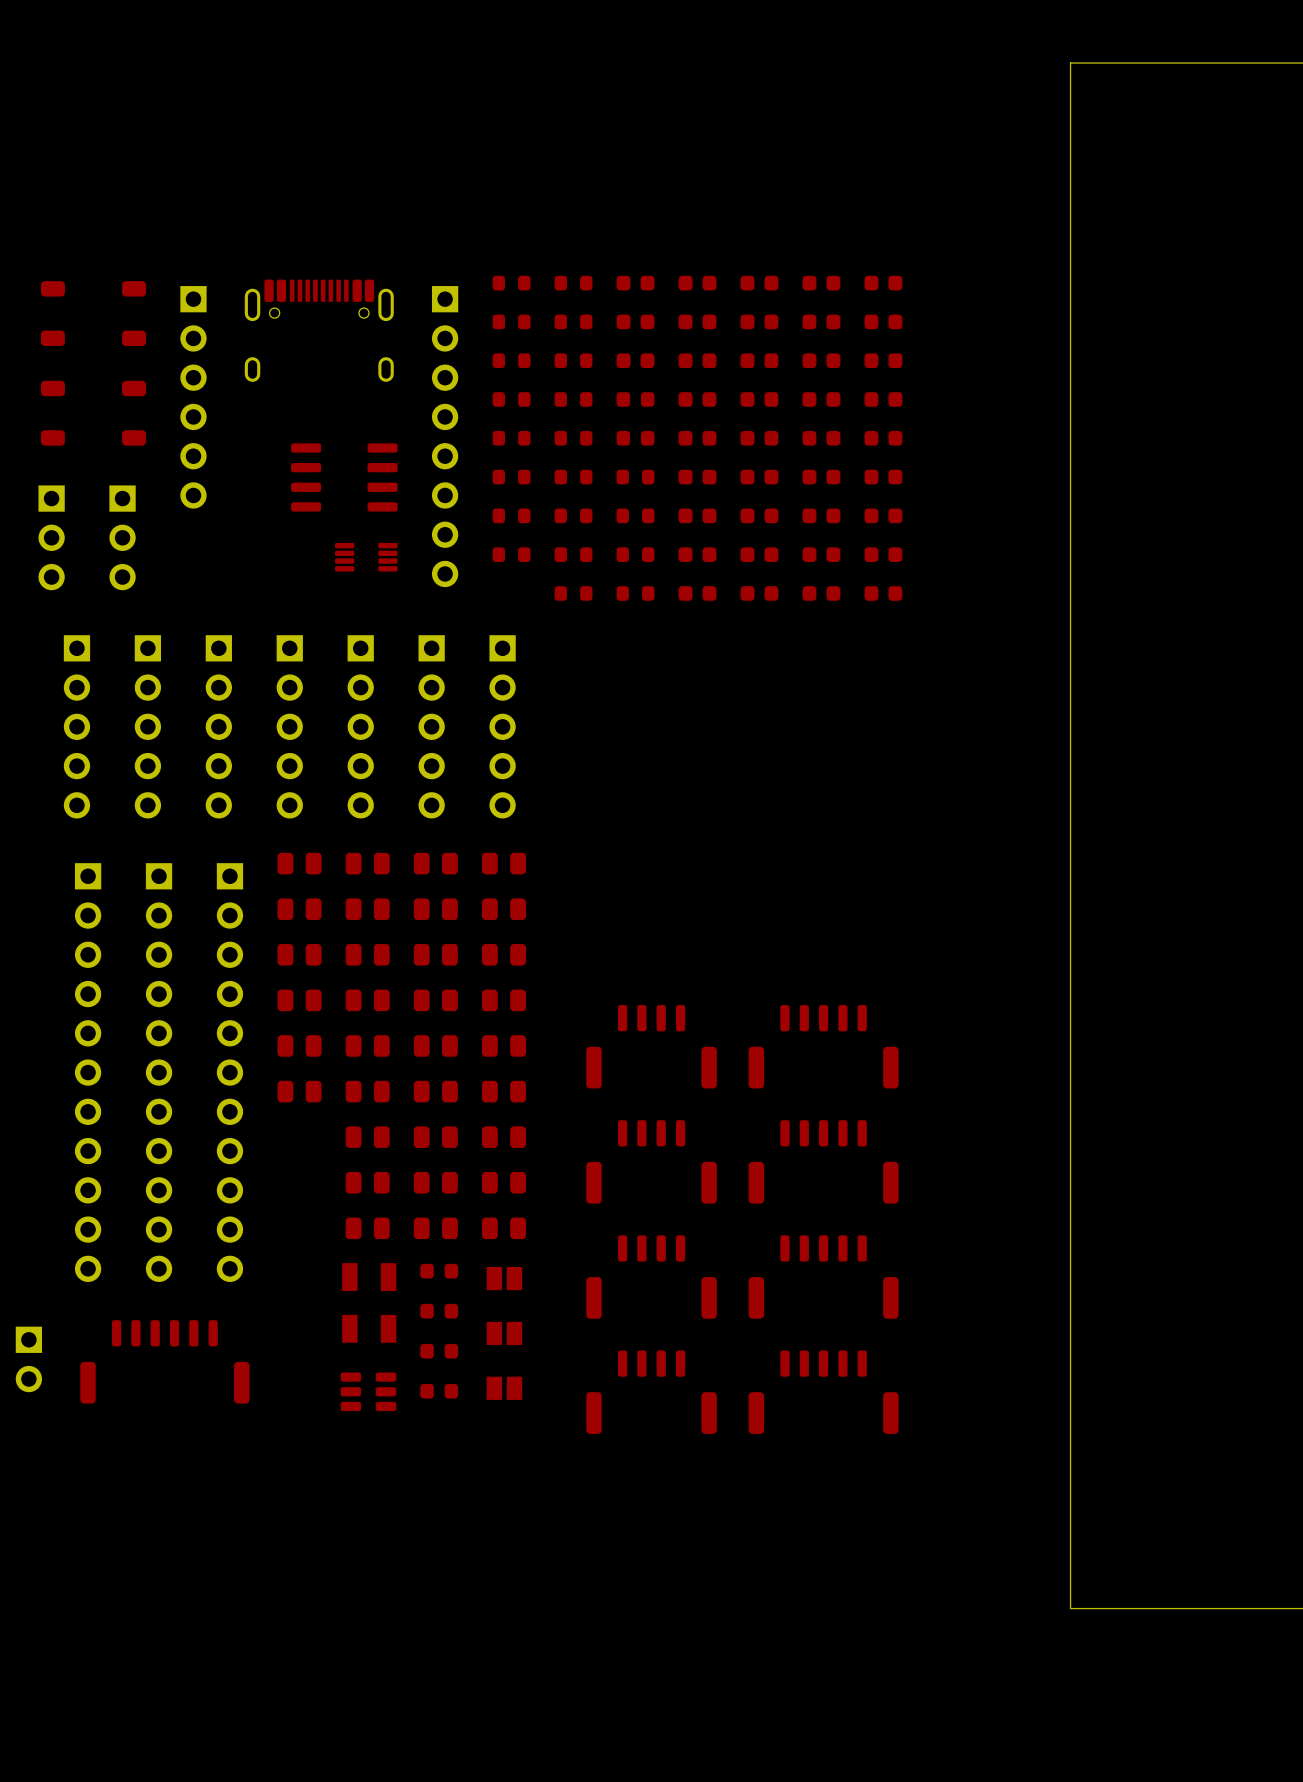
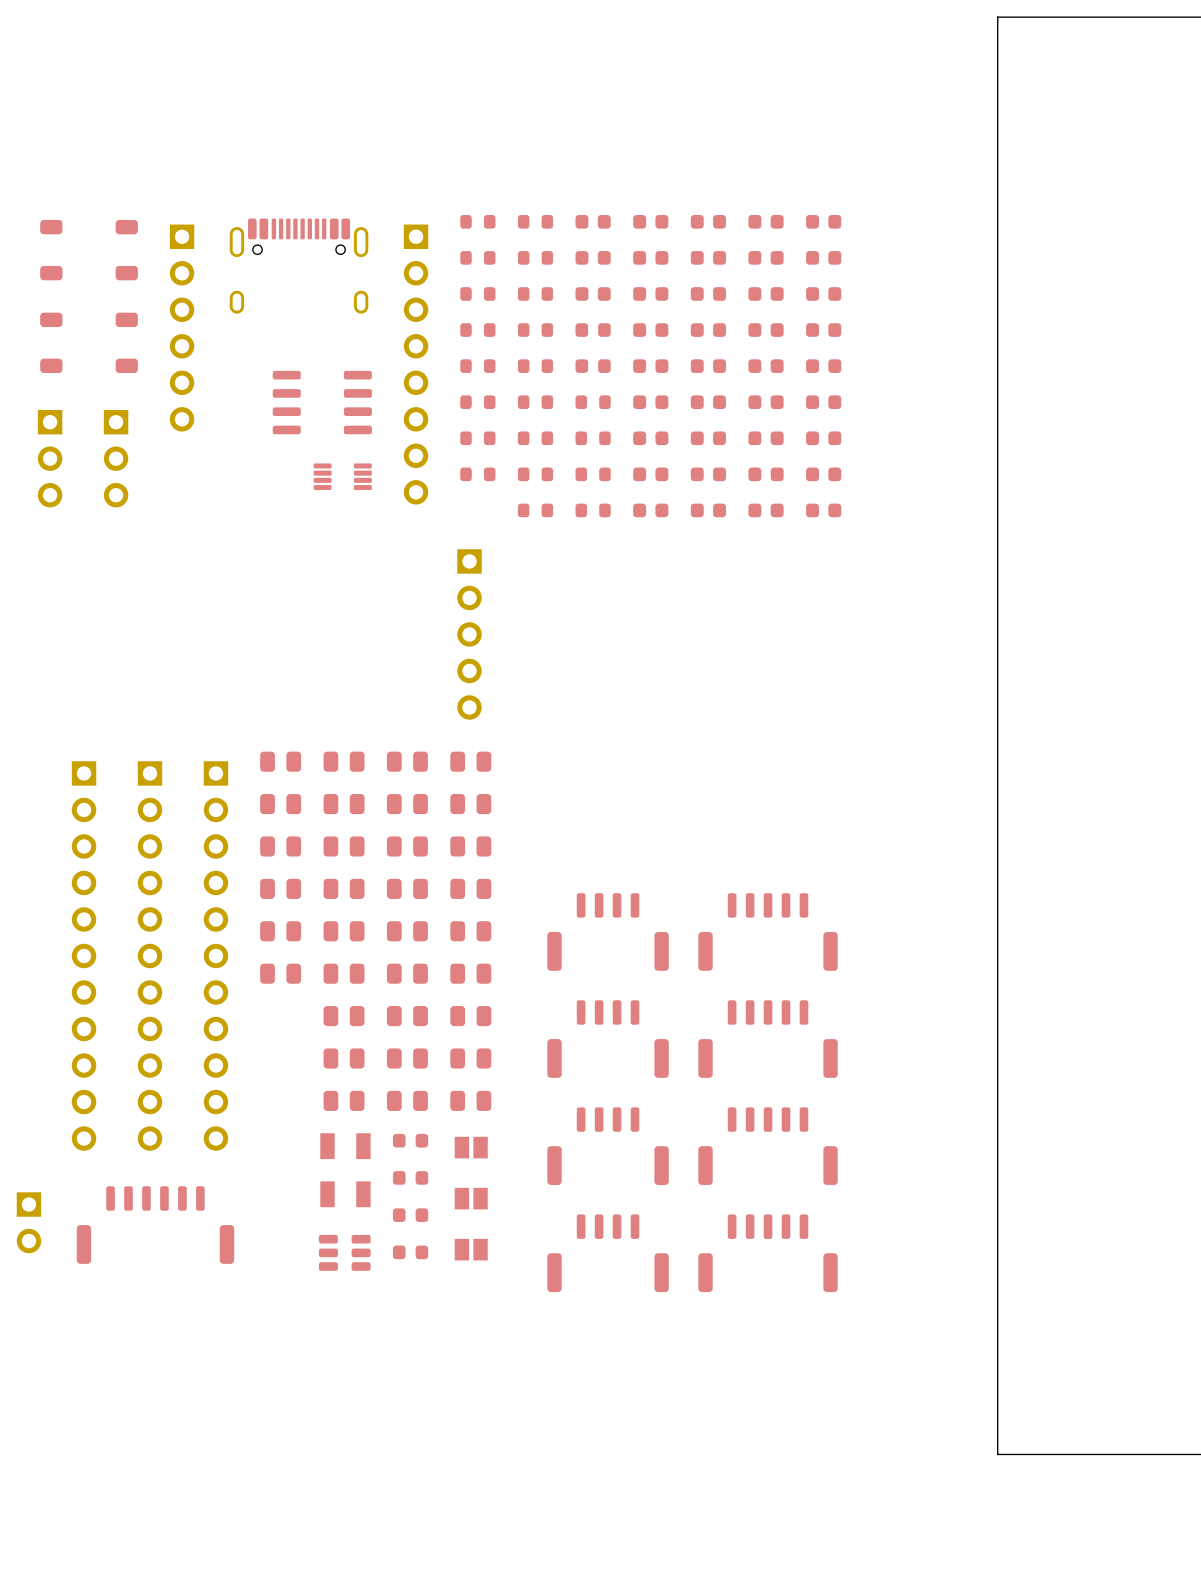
part: (76, 726) -> none
part: (147, 726) -> none
part: (218, 726) -> none
part: (289, 726) -> none
part: (360, 726) -> none
part: (431, 726) -> none

